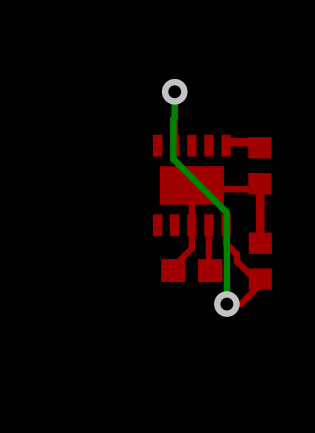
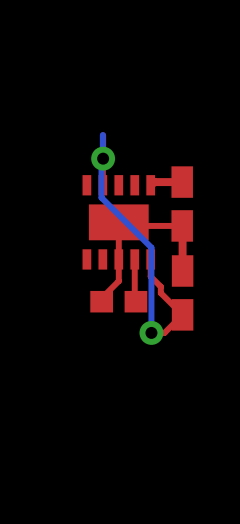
via position: (174, 91) -> (103, 158)
part footprint: [248, 137, 272, 195] -> [171, 166, 193, 242]
part footprint: [248, 232, 272, 290] -> [171, 255, 194, 331]

